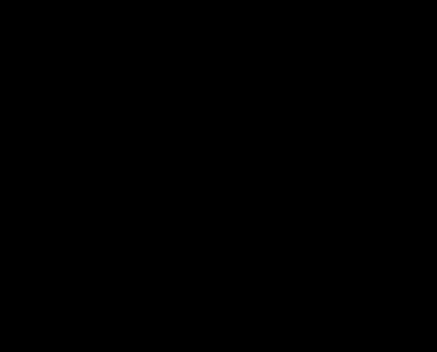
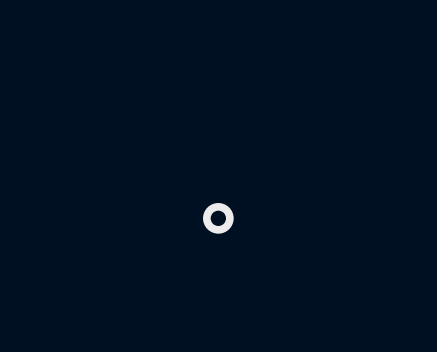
via: none -> (218, 218)

